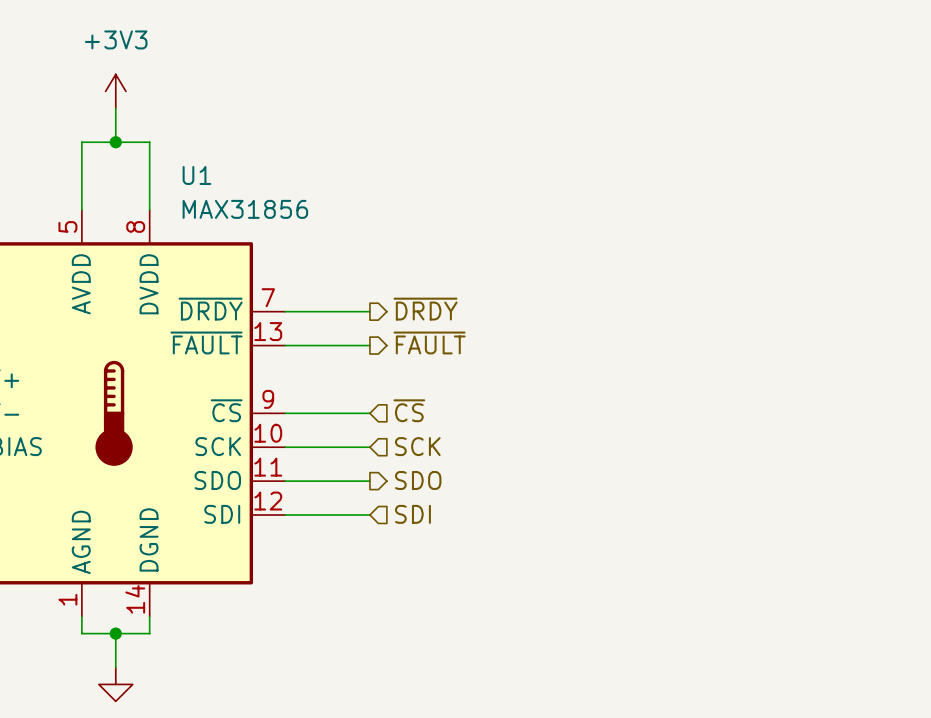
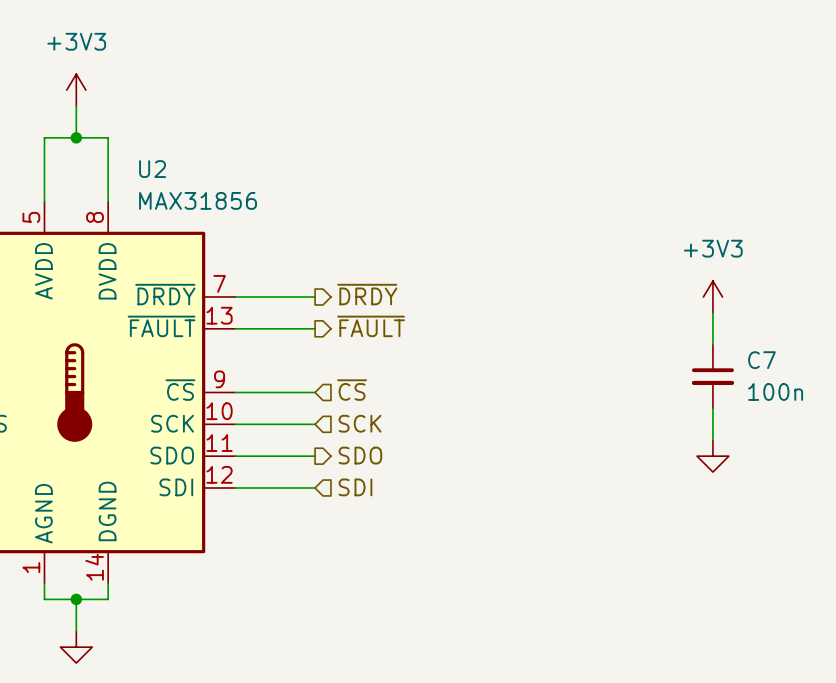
U1 name: U1 (196, 175) -> U2 (152, 169)
power symbol: none -> +3V3 (712, 297)
wire: none -> (712, 312) (712, 344)
C7: none -> 100n (712, 376)
wire: none -> (712, 408) (712, 440)
power symbol: none -> (712, 456)

